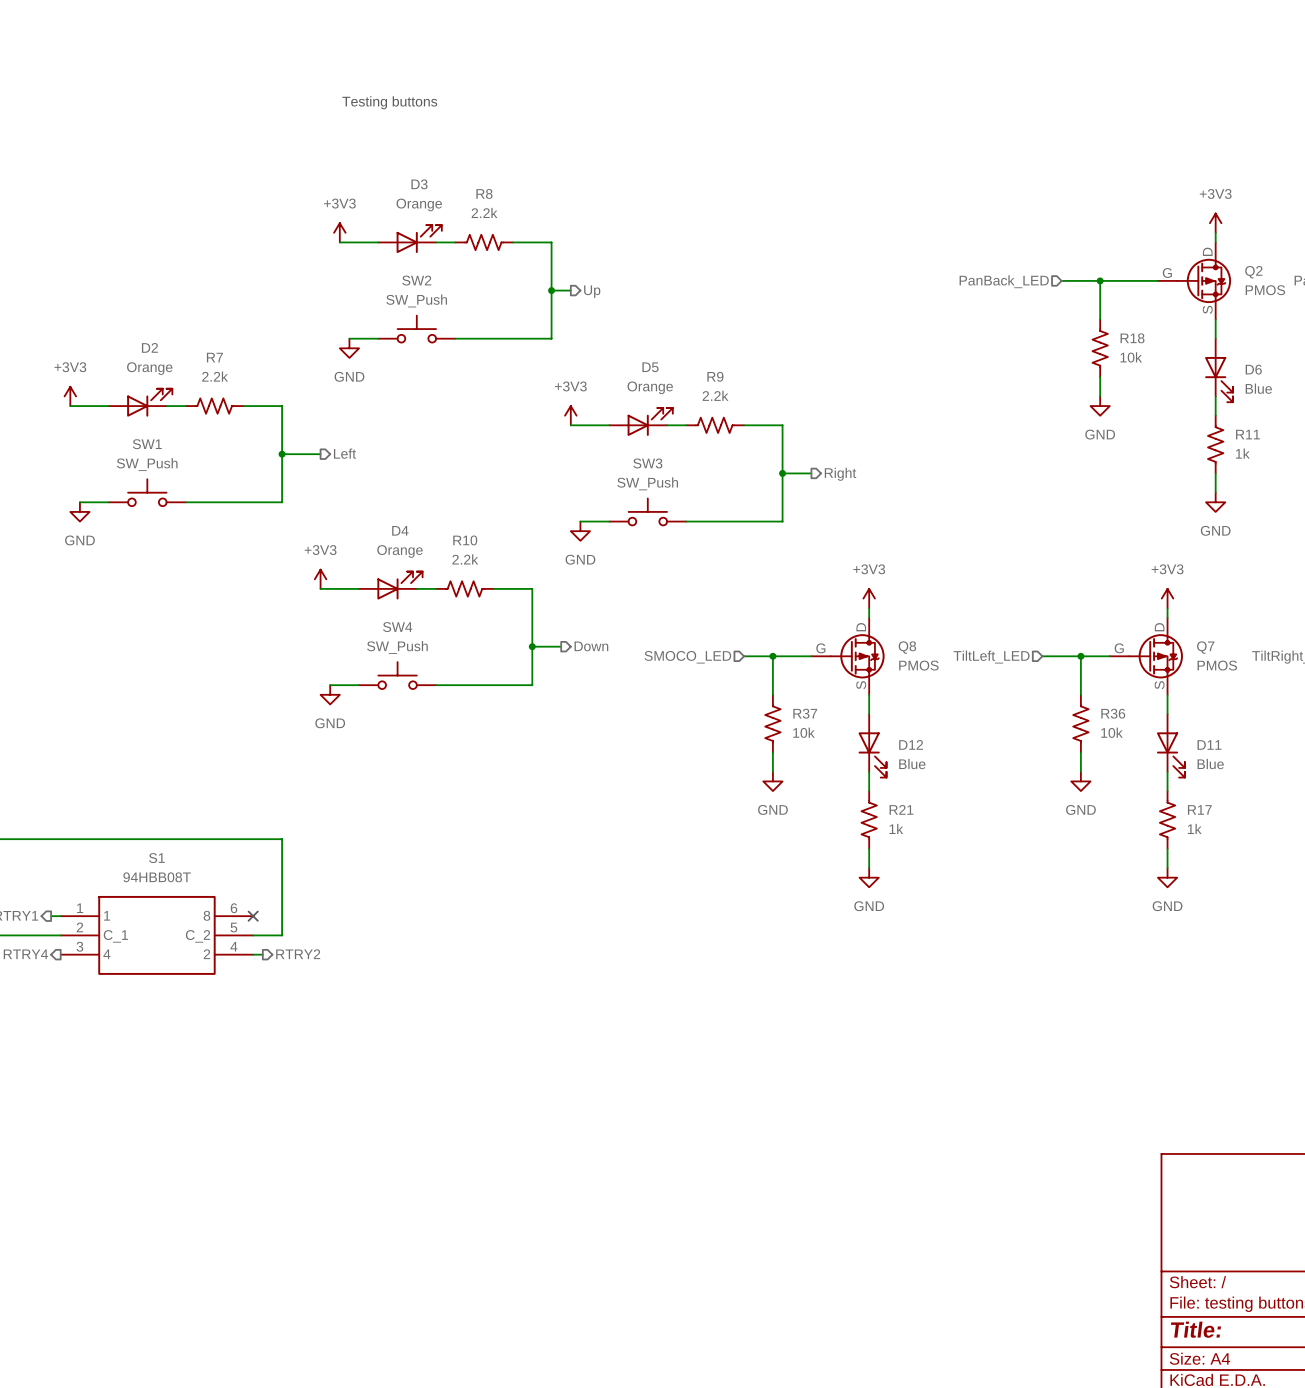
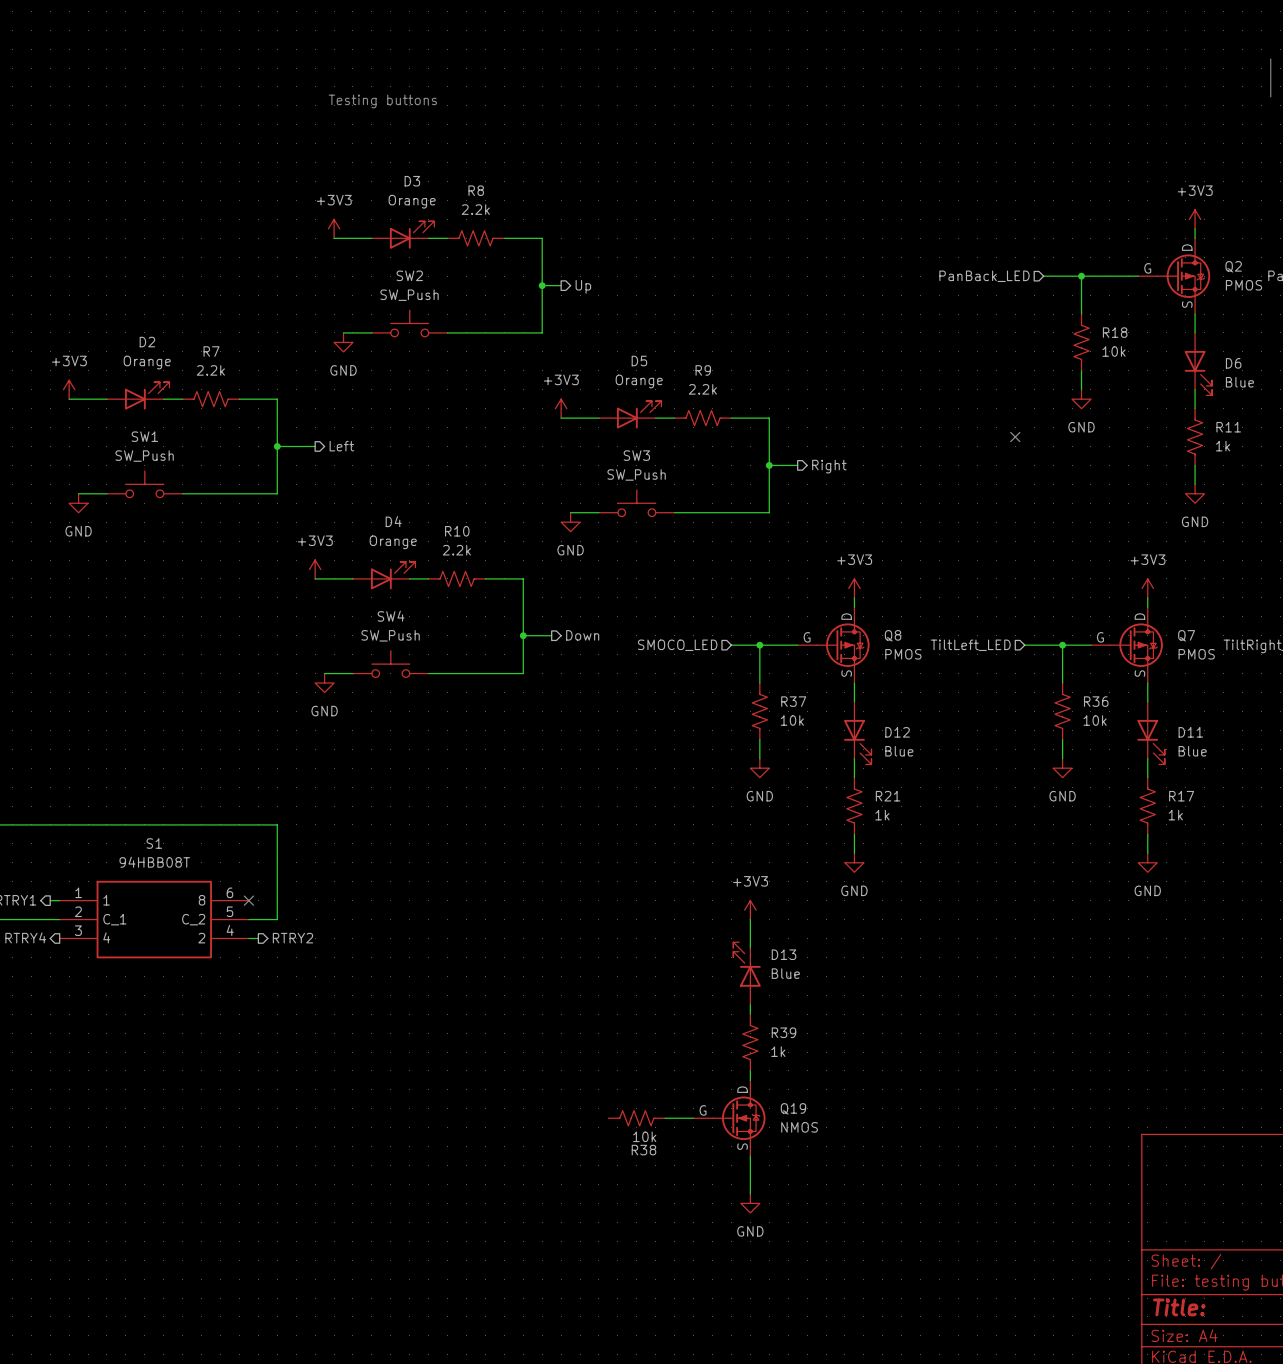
no-connect mark: none -> (1015, 437)
power symbol: none -> +3V3 (750, 910)
wire: none -> (750, 919) (750, 947)
D13: none -> Blue (747, 973)
wire: none -> (750, 1004) (750, 1014)
R39: none -> 1k (750, 1042)
wire: none -> (750, 1070) (750, 1080)
R38: none -> 10k (636, 1118)
wire: none -> (665, 1118) (693, 1118)
Q19: none -> NMOS (729, 1118)
wire: none -> (750, 1156) (750, 1193)
power symbol: none -> GND (750, 1203)

